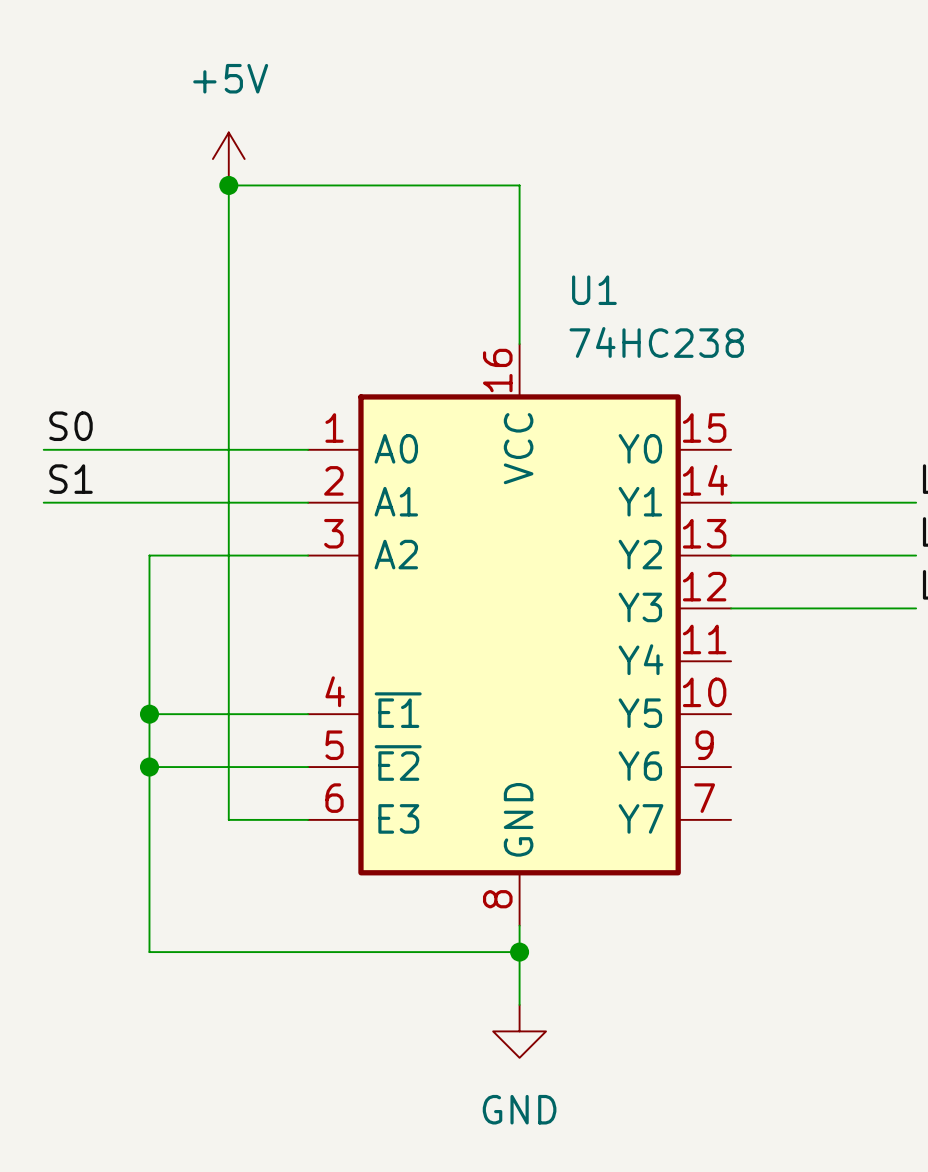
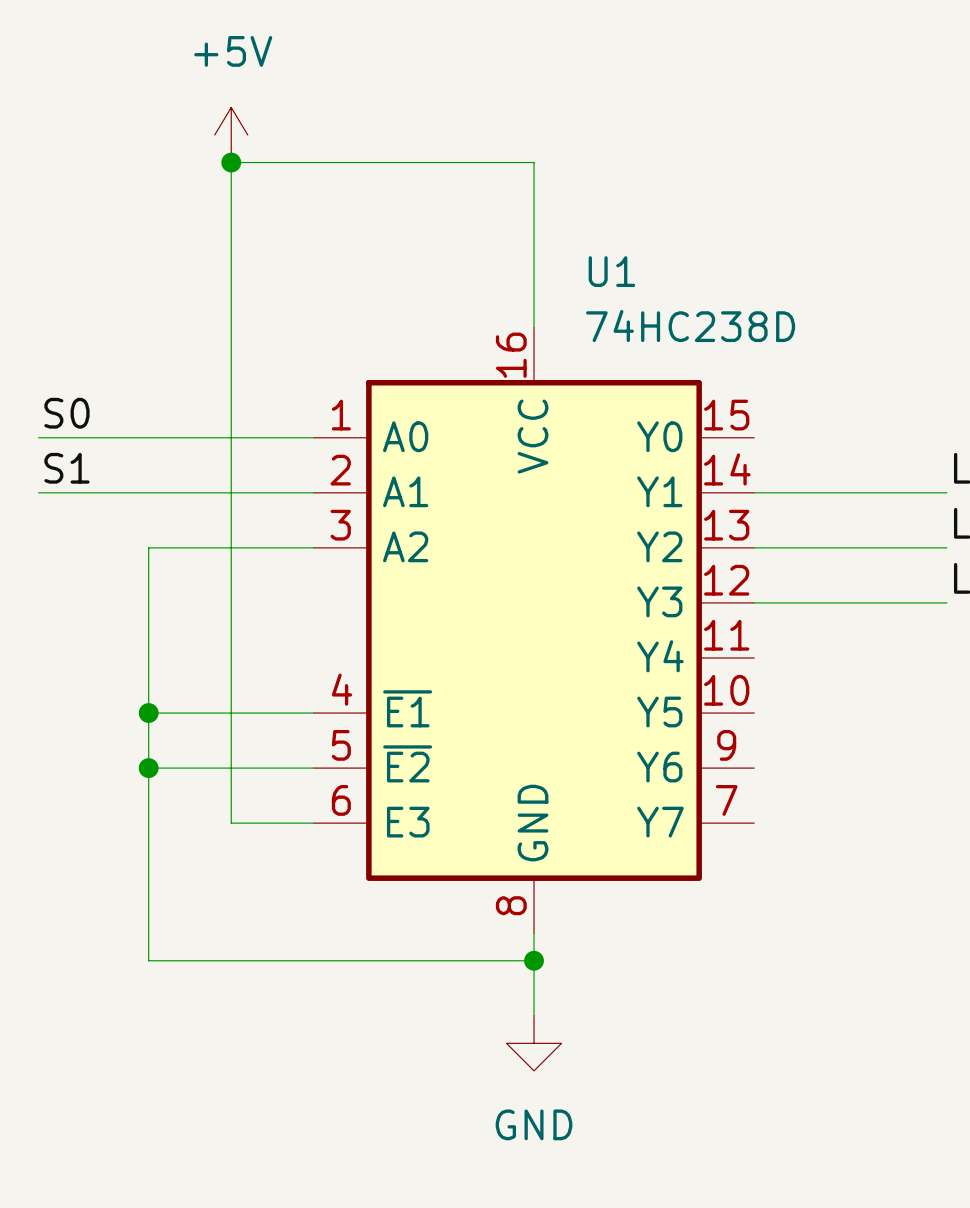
U1 value: 74HC238 (656, 342) -> 74HC238D (690, 326)

